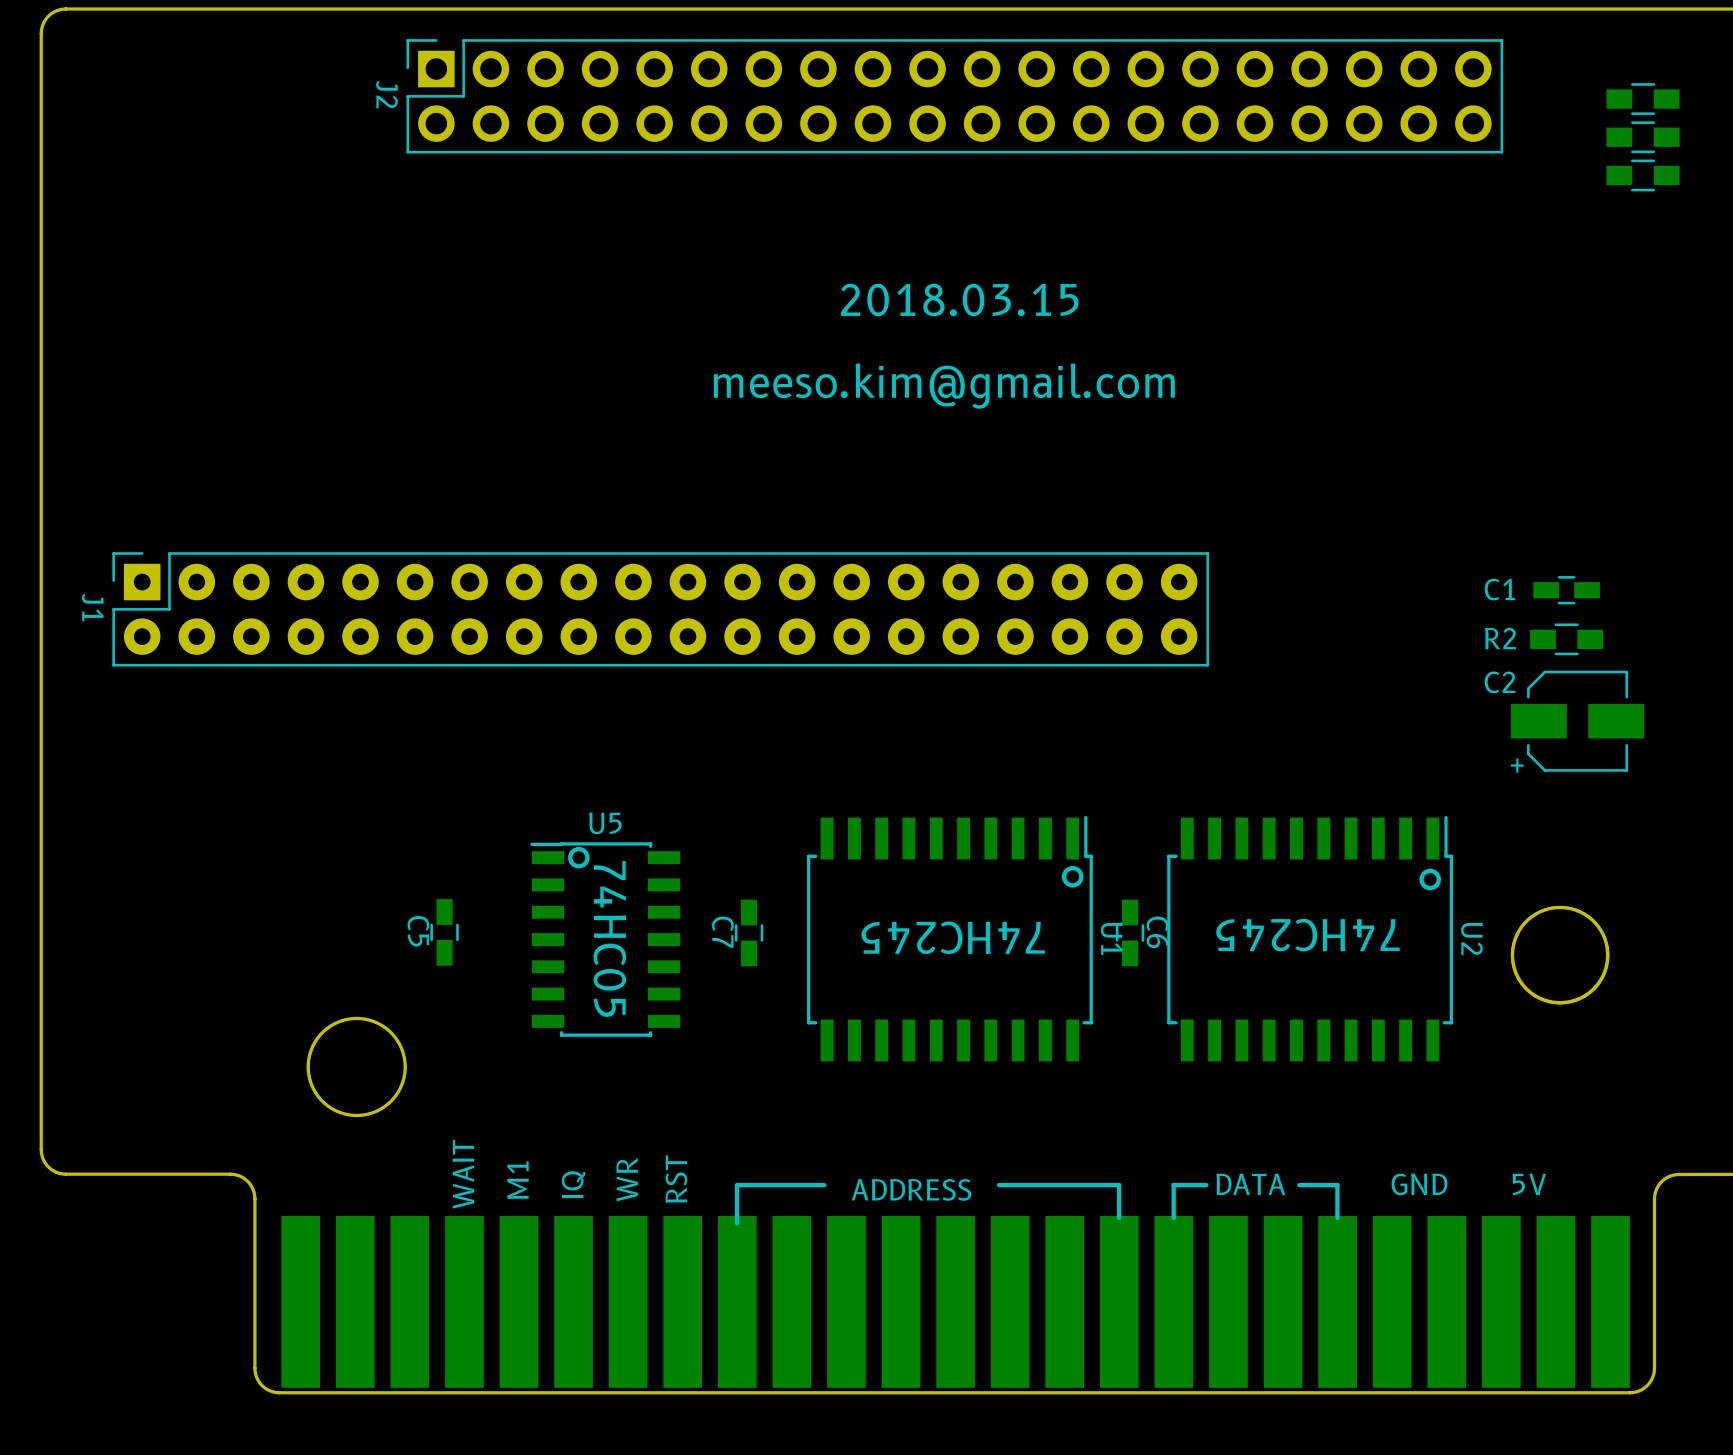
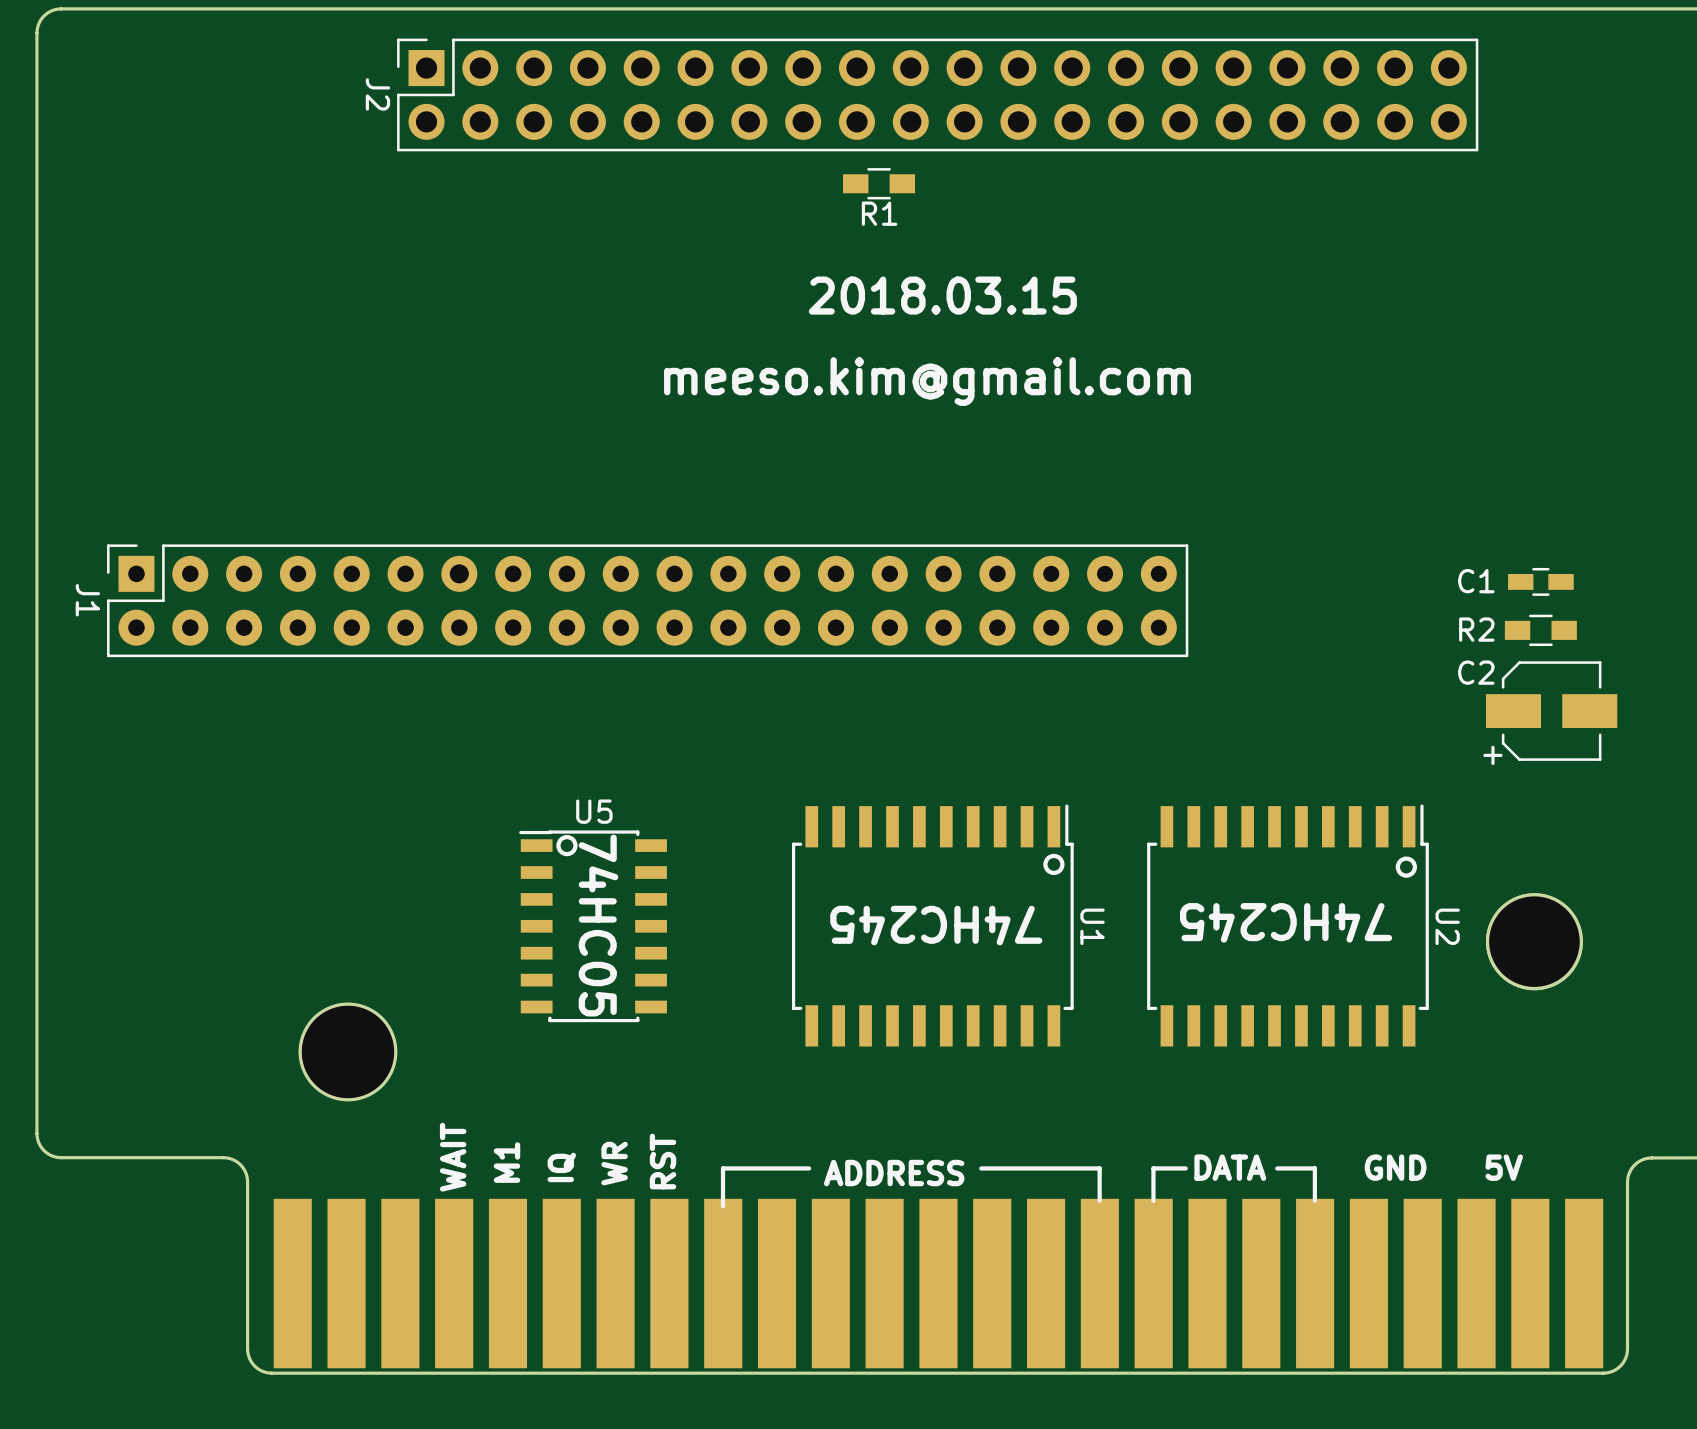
part: (1643, 99) -> none
part: (1643, 137) -> none
part: (1643, 175) -> none
R1: none -> (879, 183)
C5: (444, 932) -> none
C7: (749, 932) -> none
C6: (1130, 932) -> none

